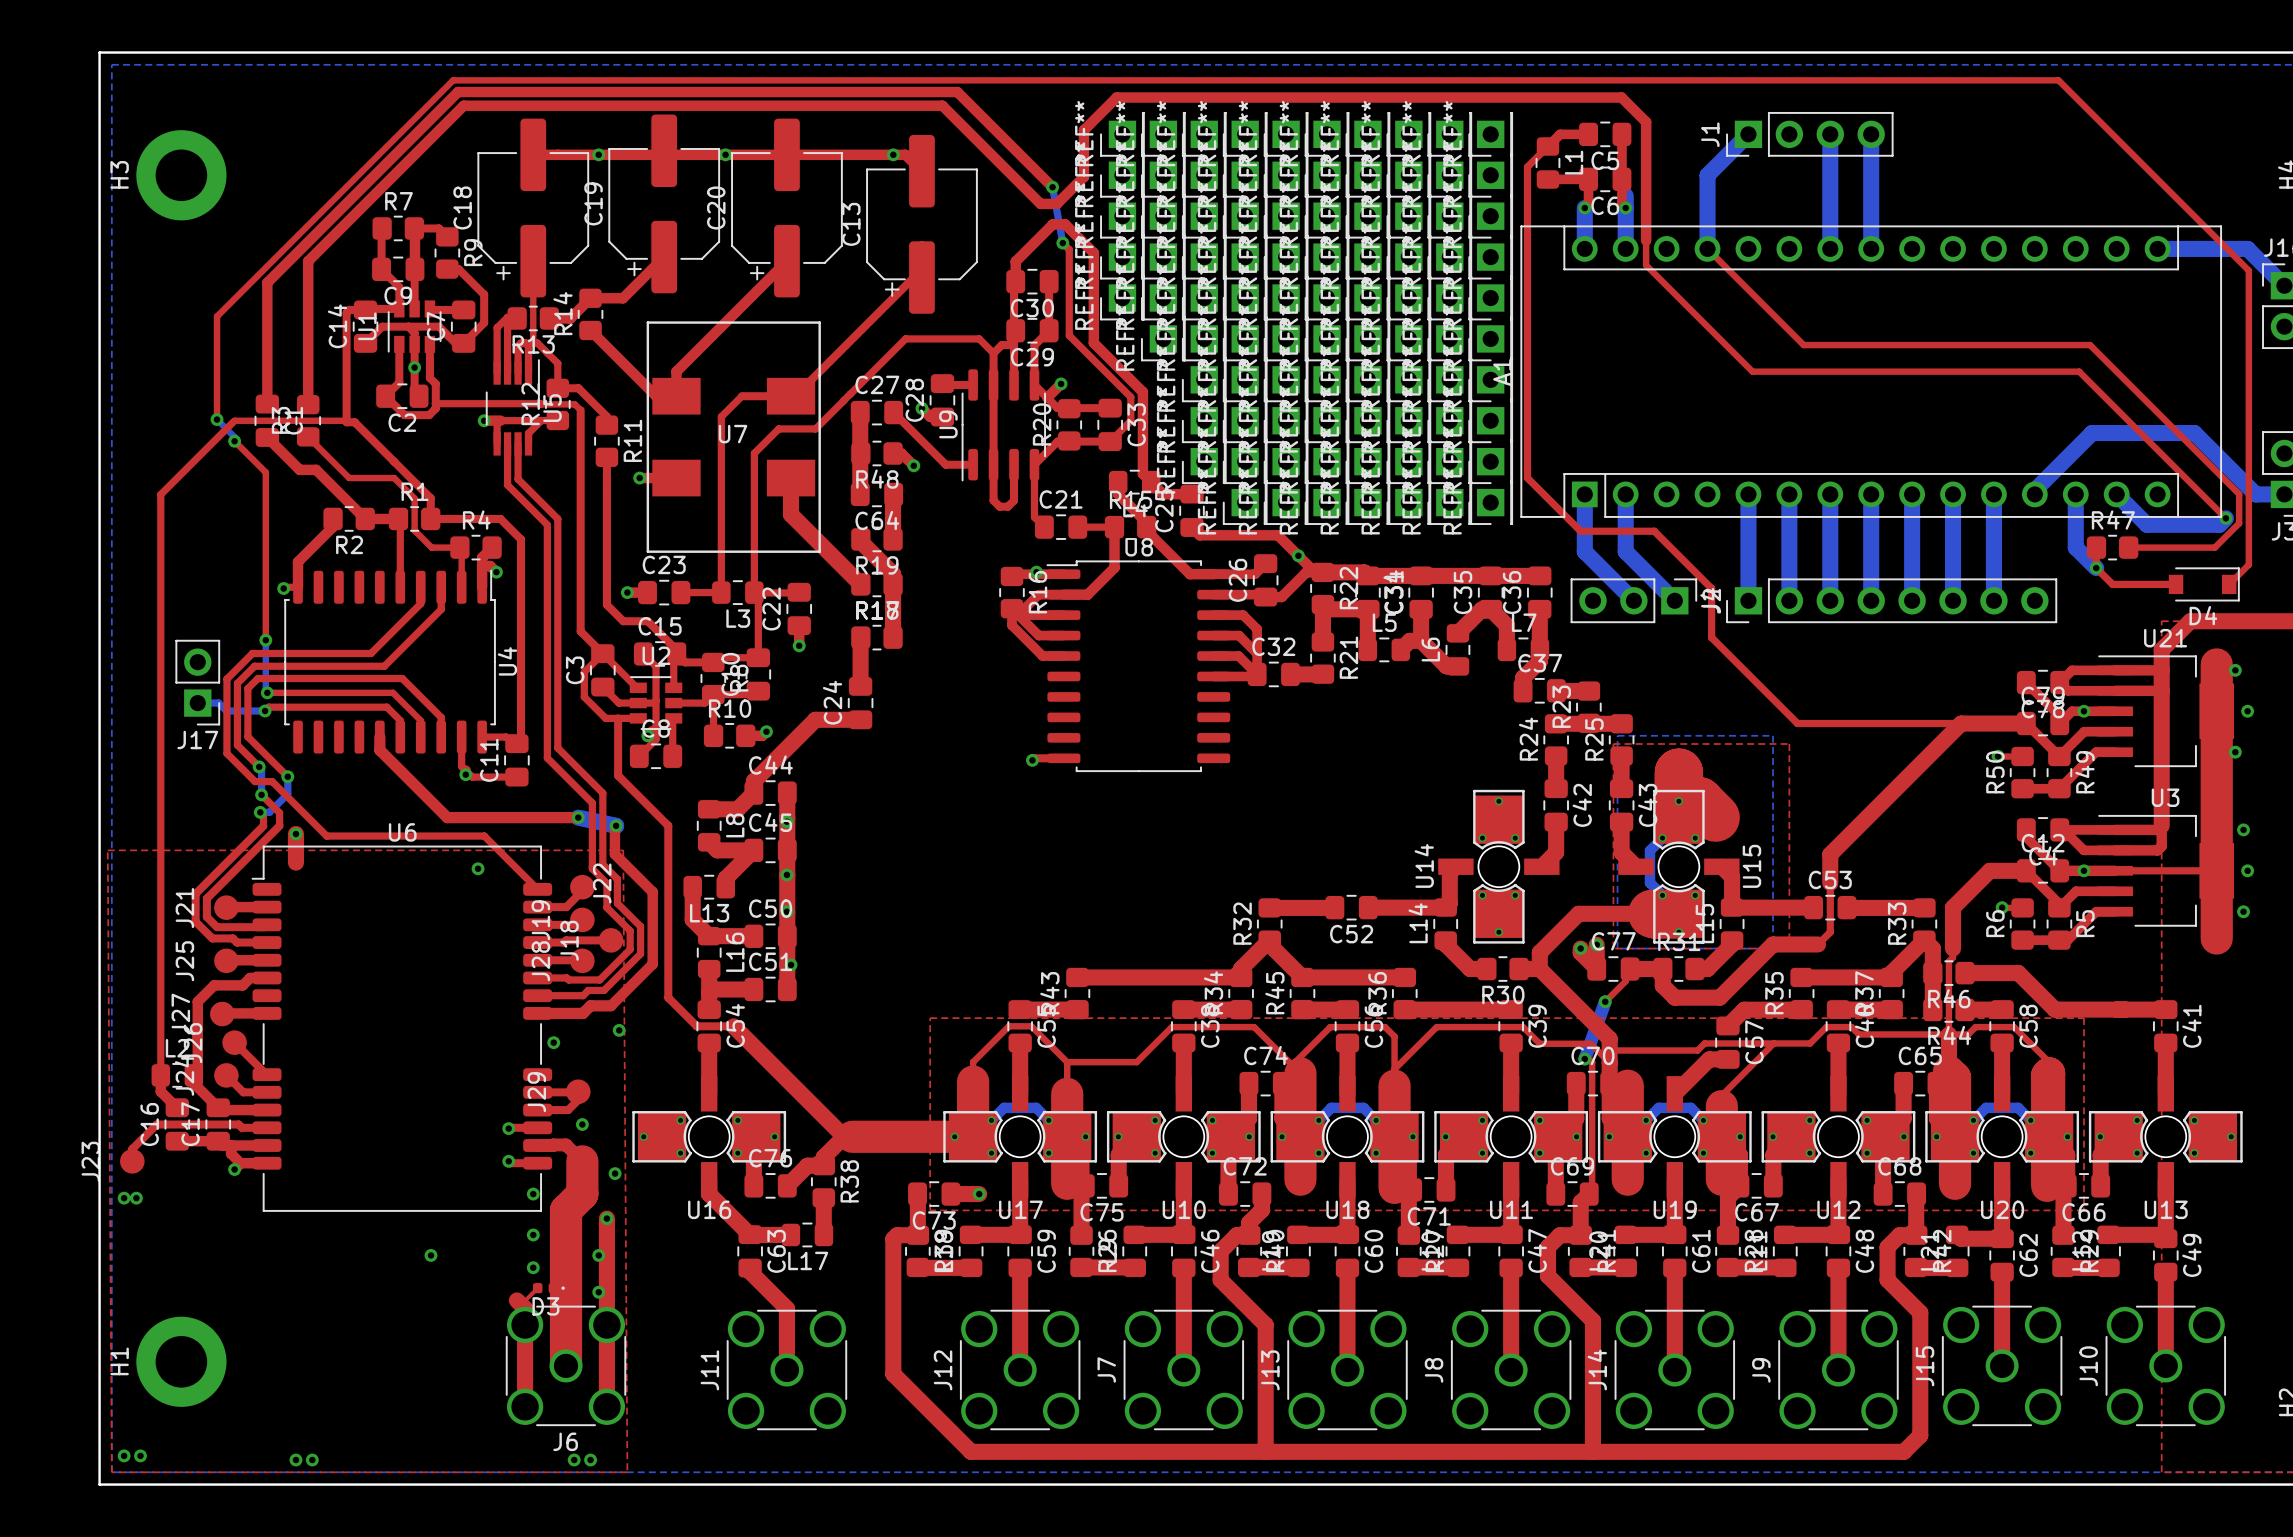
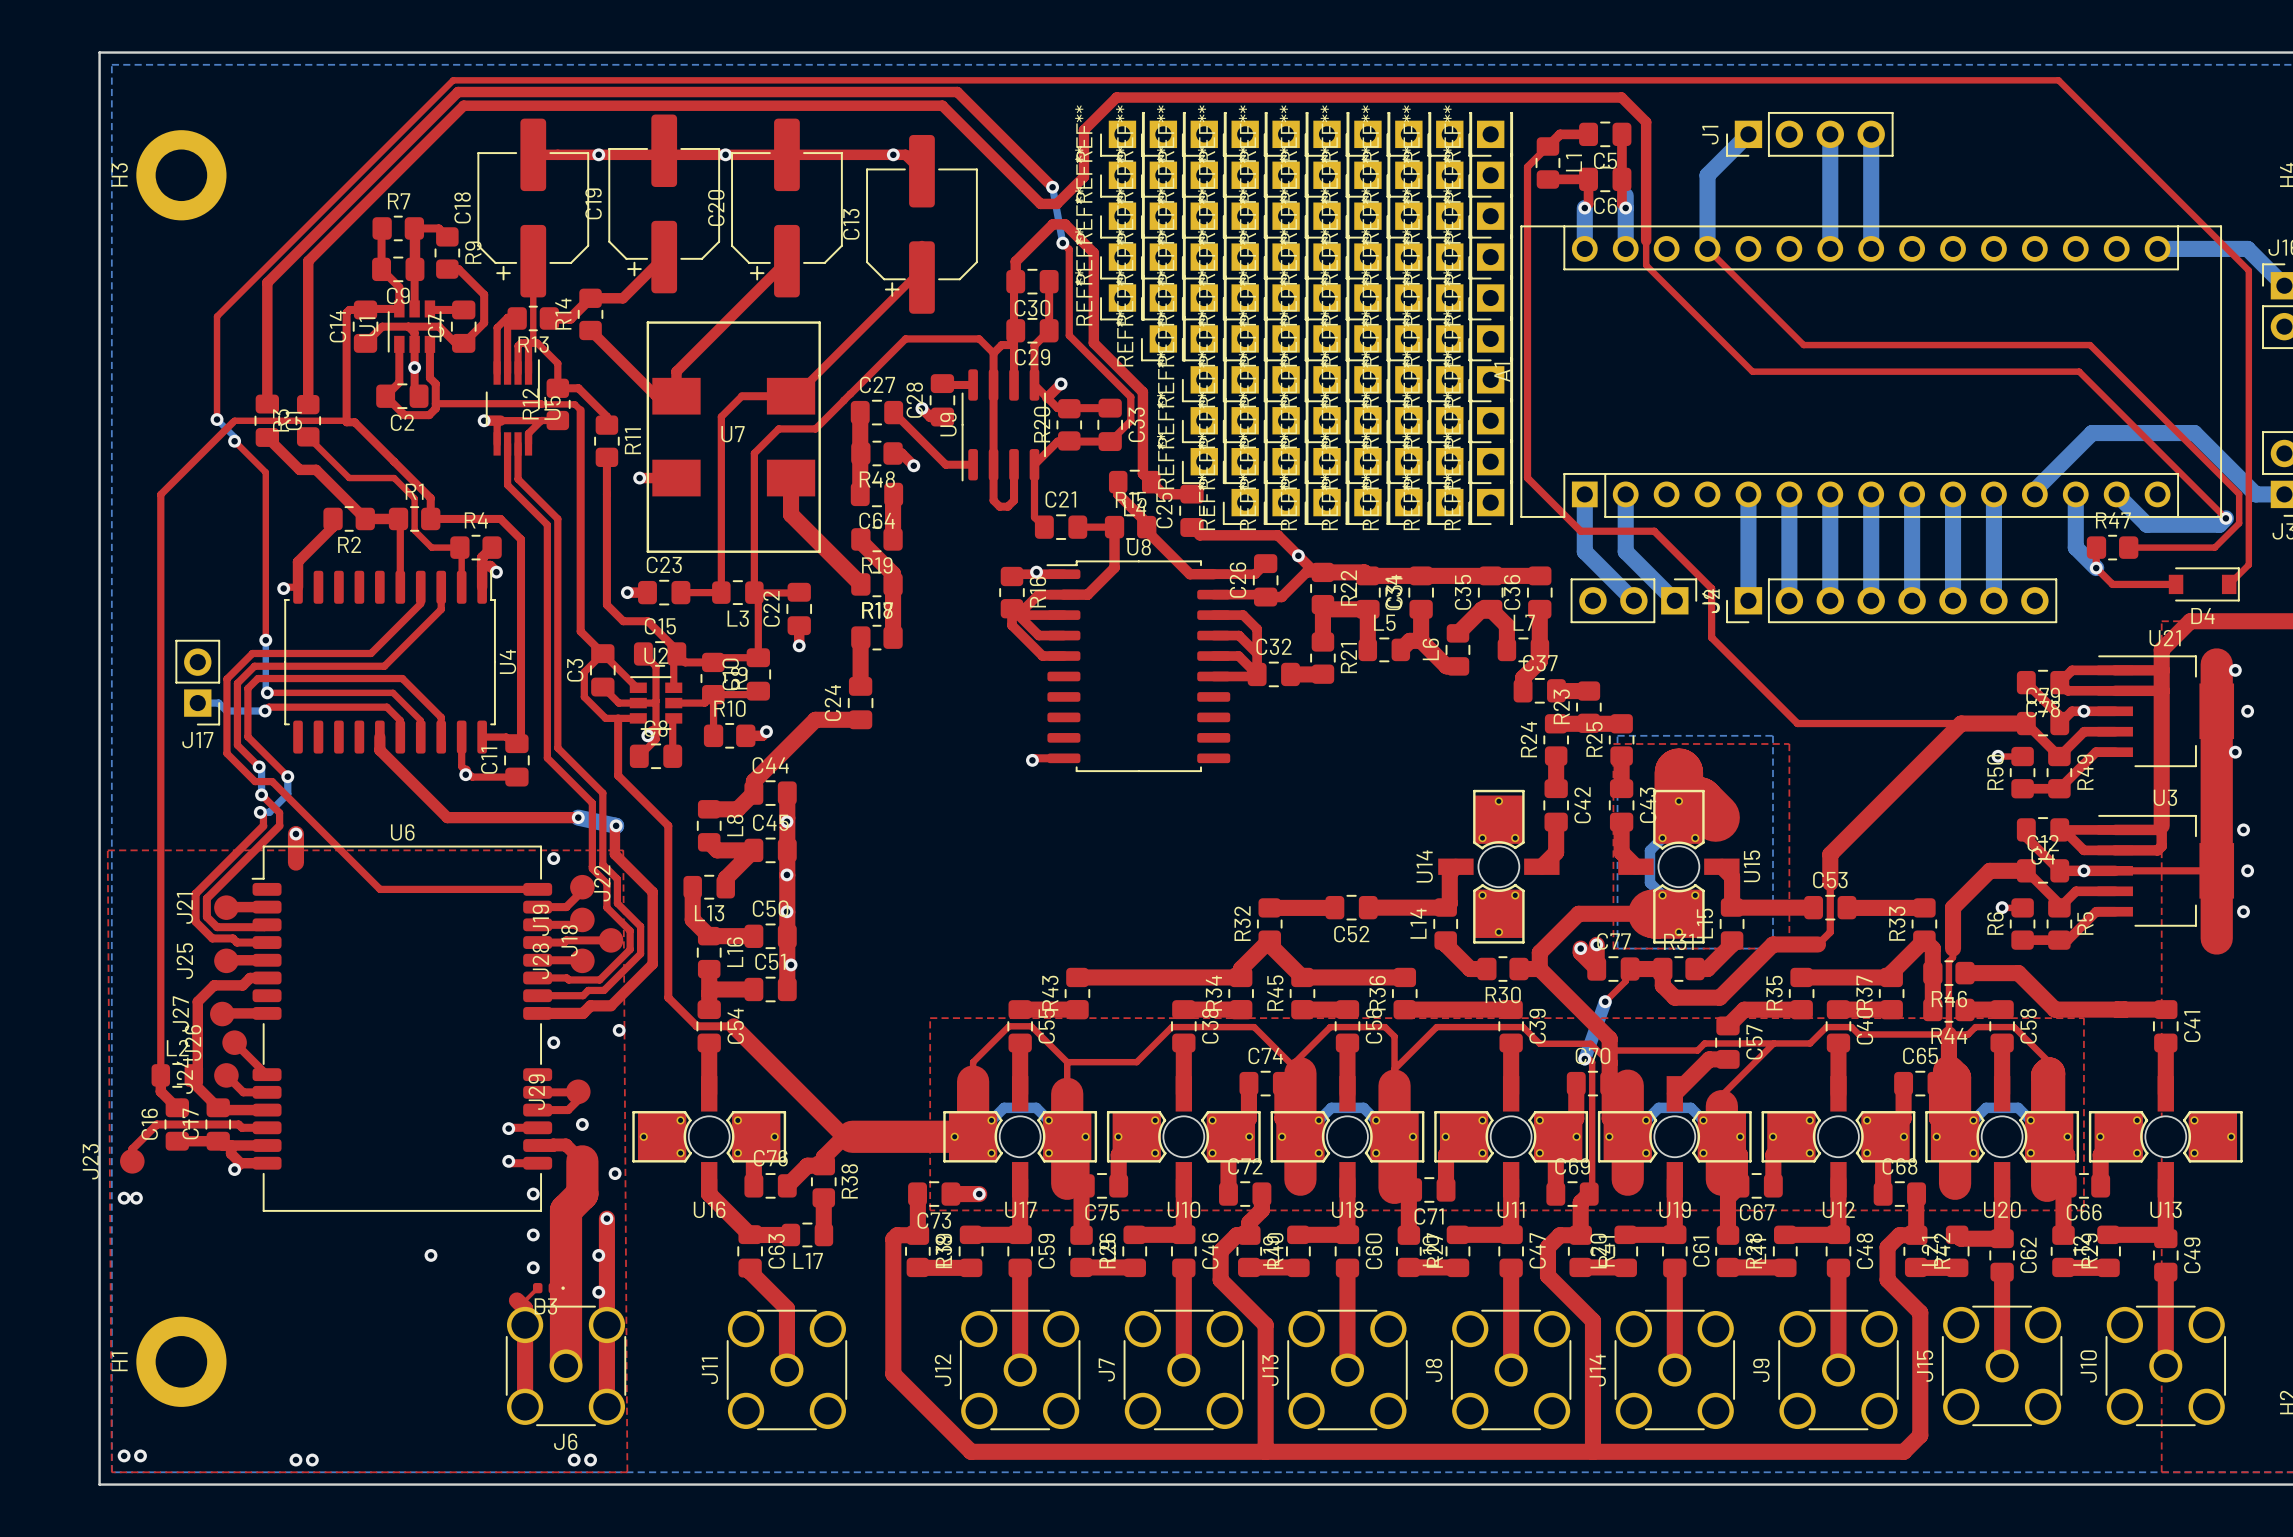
top track: (326, 836) (484, 836) (537, 889) -> (326, 836) (380, 889) (537, 889)
via position: (478, 868) -> (553, 858)

